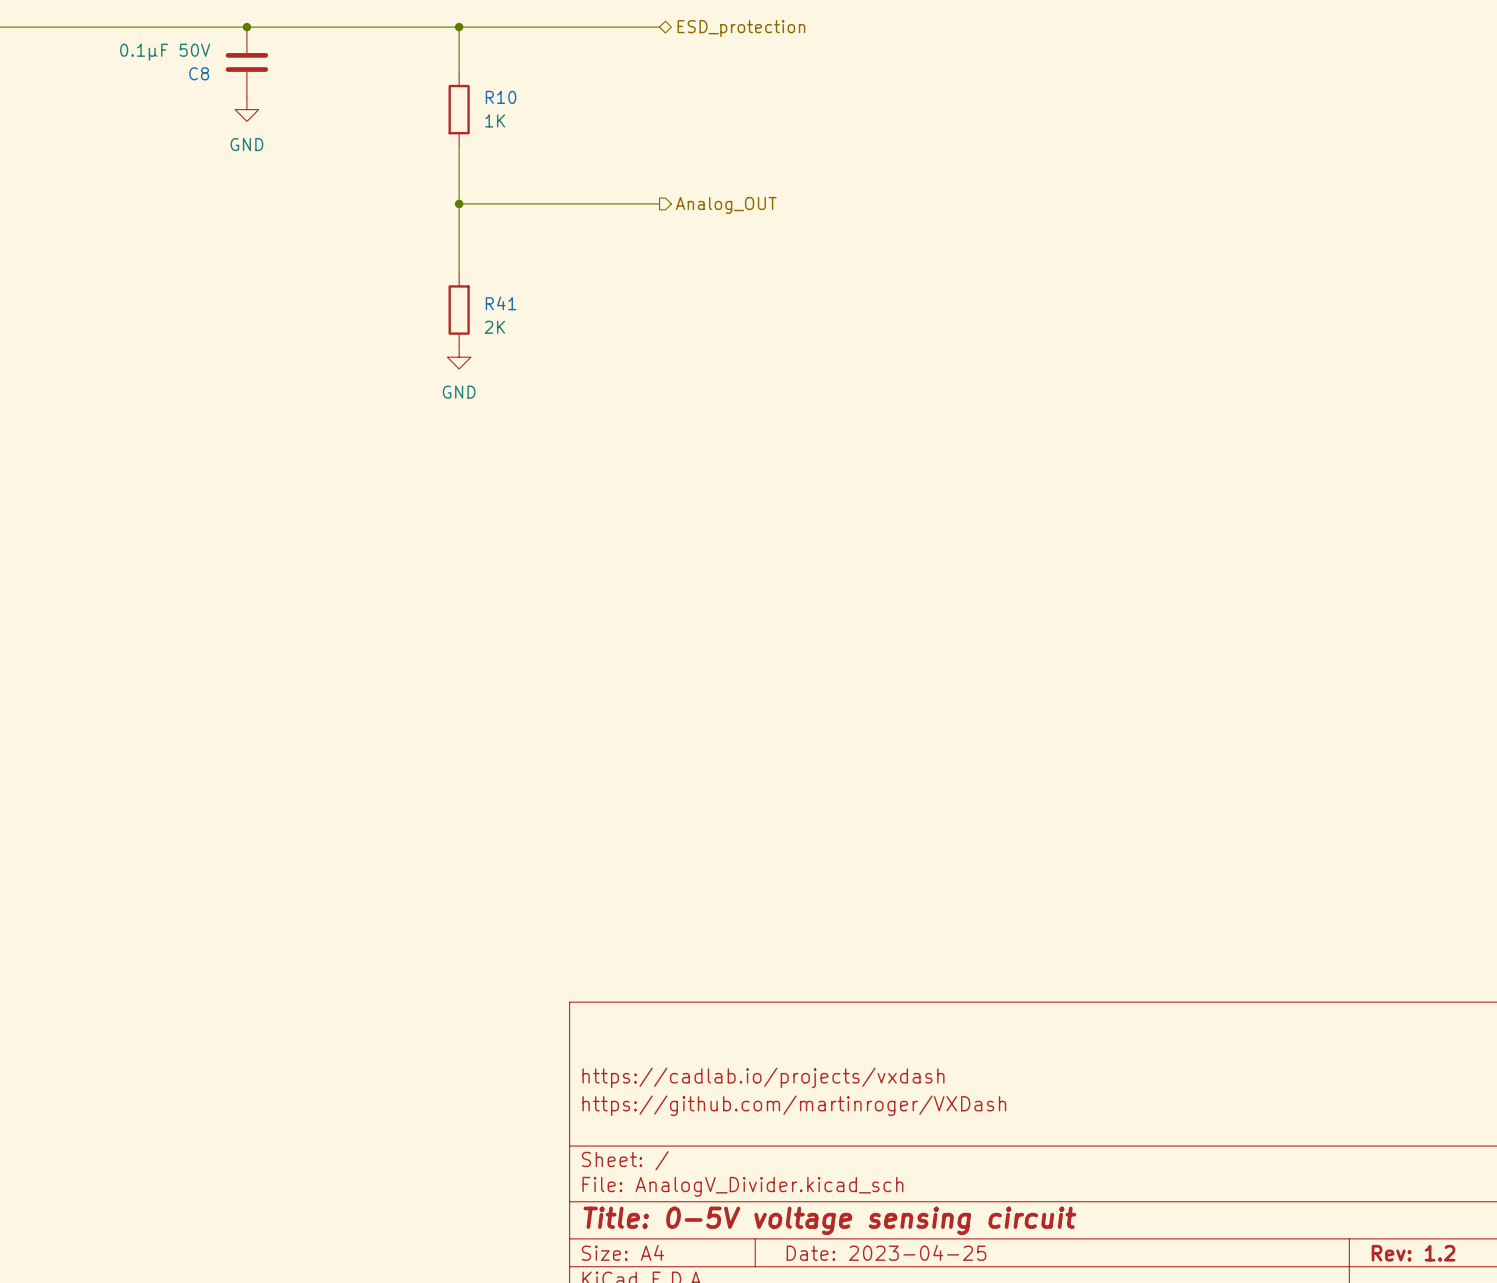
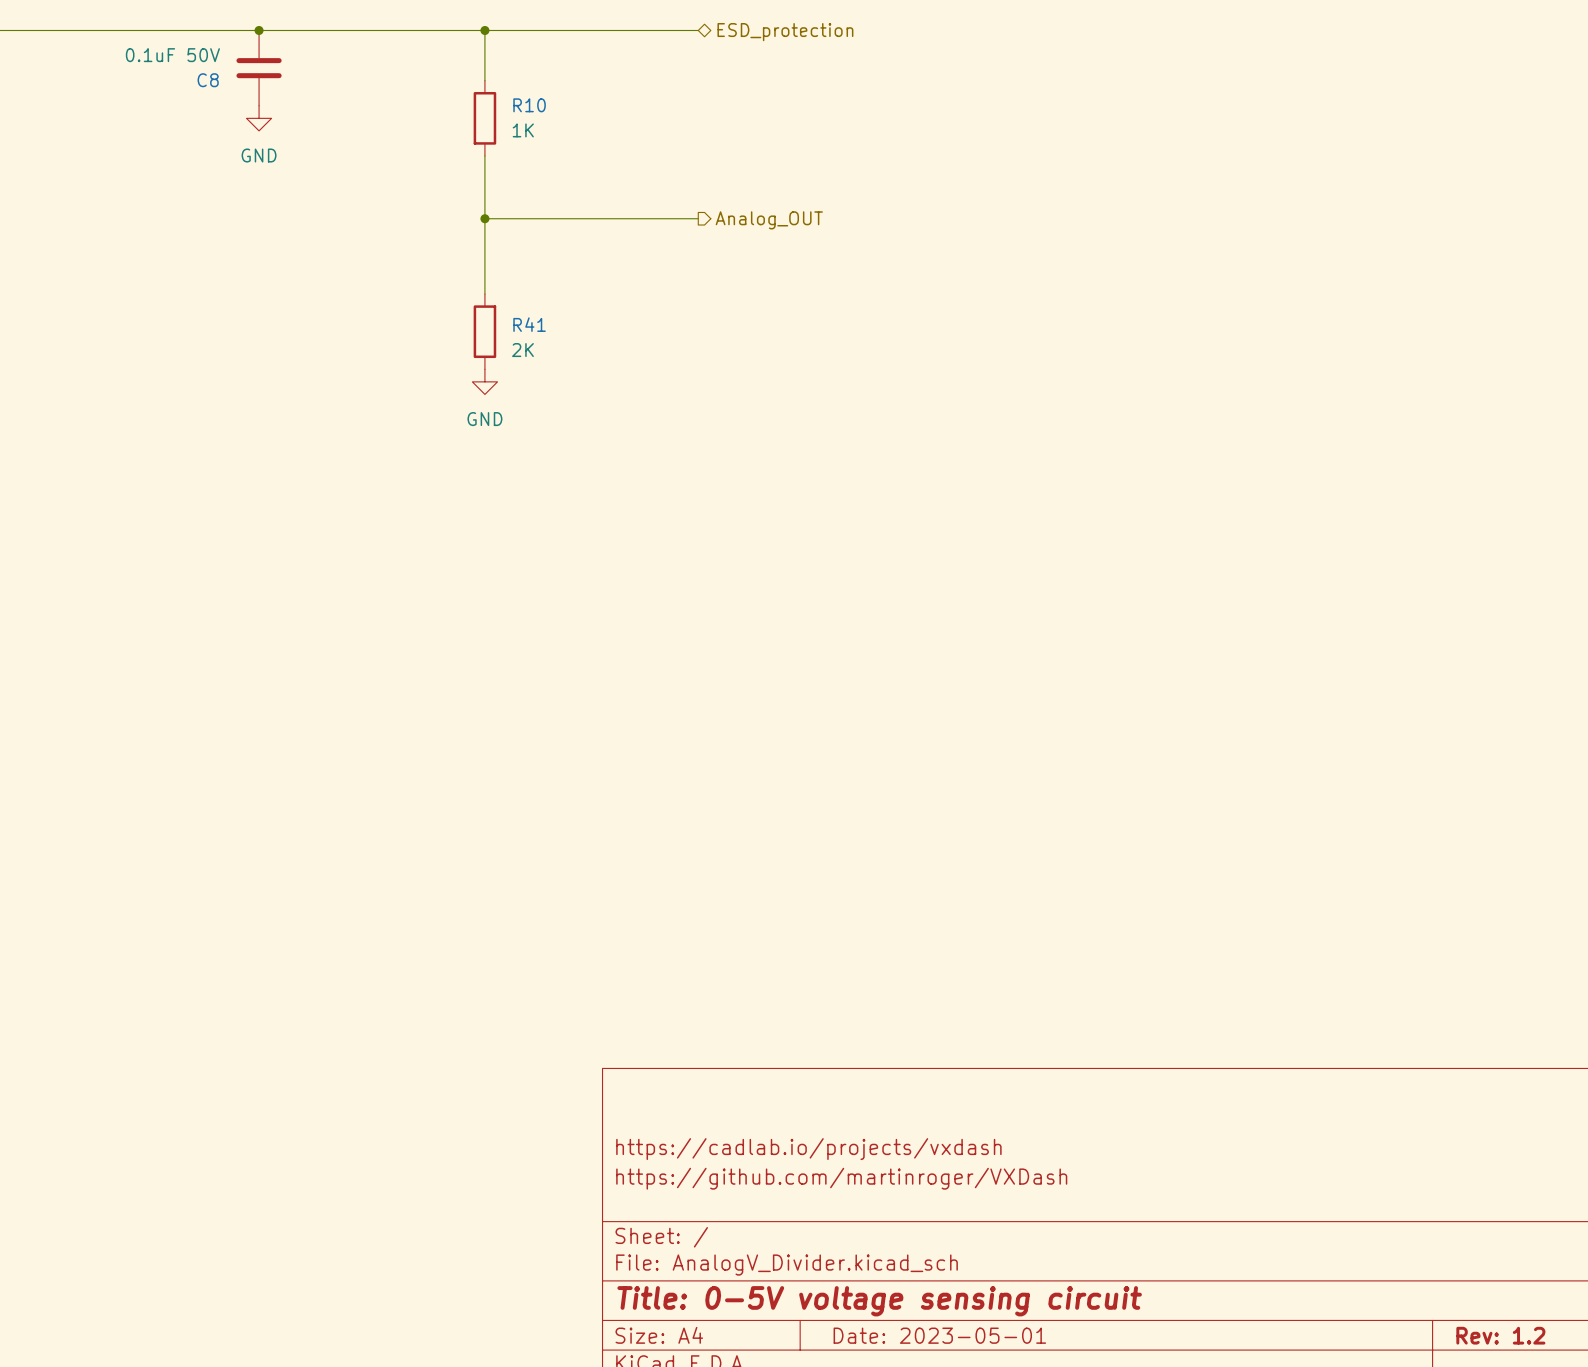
C8 value: 0.1µF 50V (165, 52) -> 0.1uF 50V (172, 55)
title block: Date: 2023-04-25 (886, 1252) -> Date: 2023-05-01 (939, 1335)

